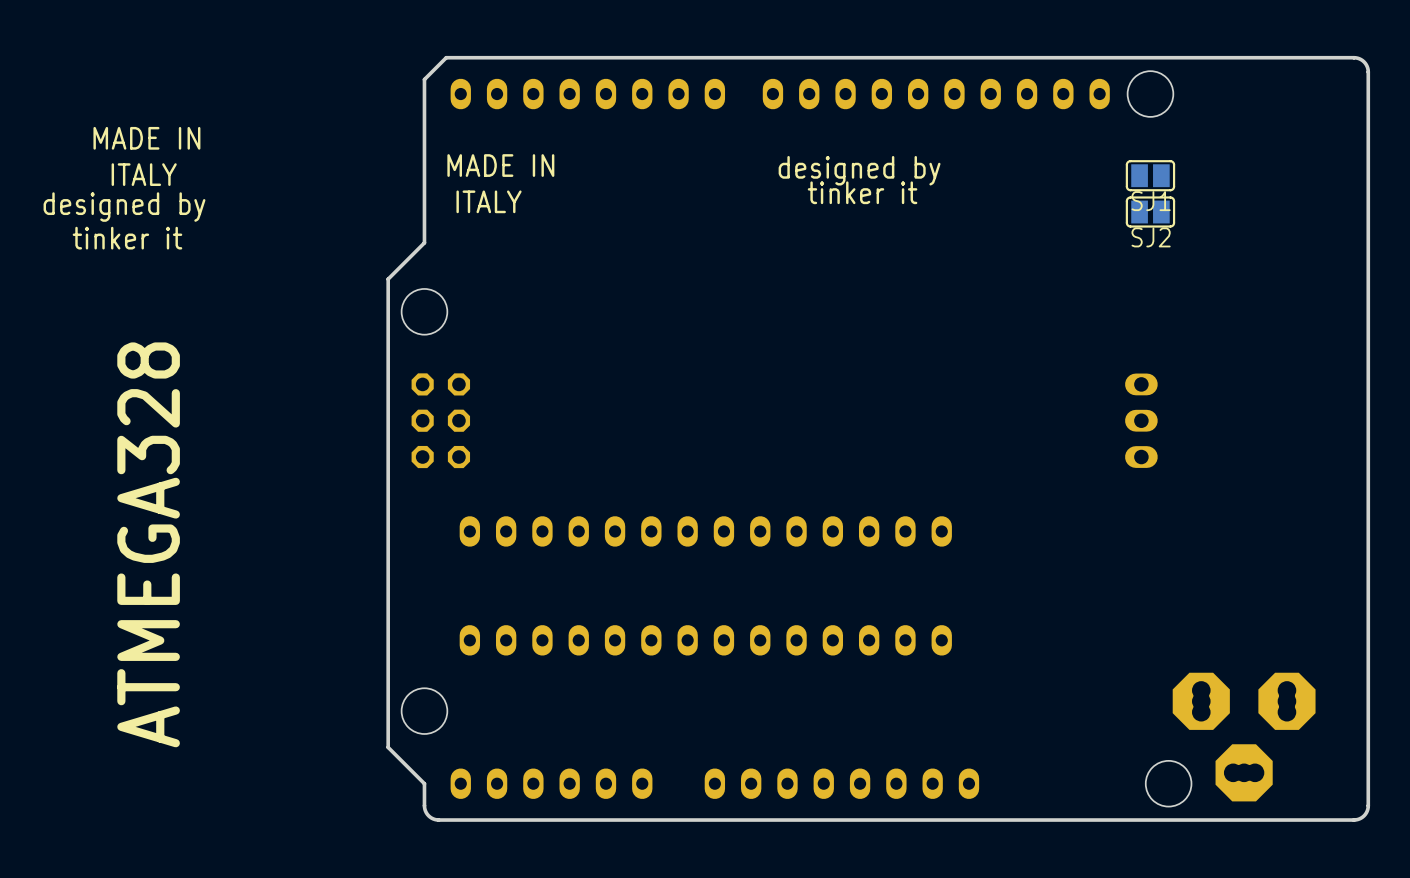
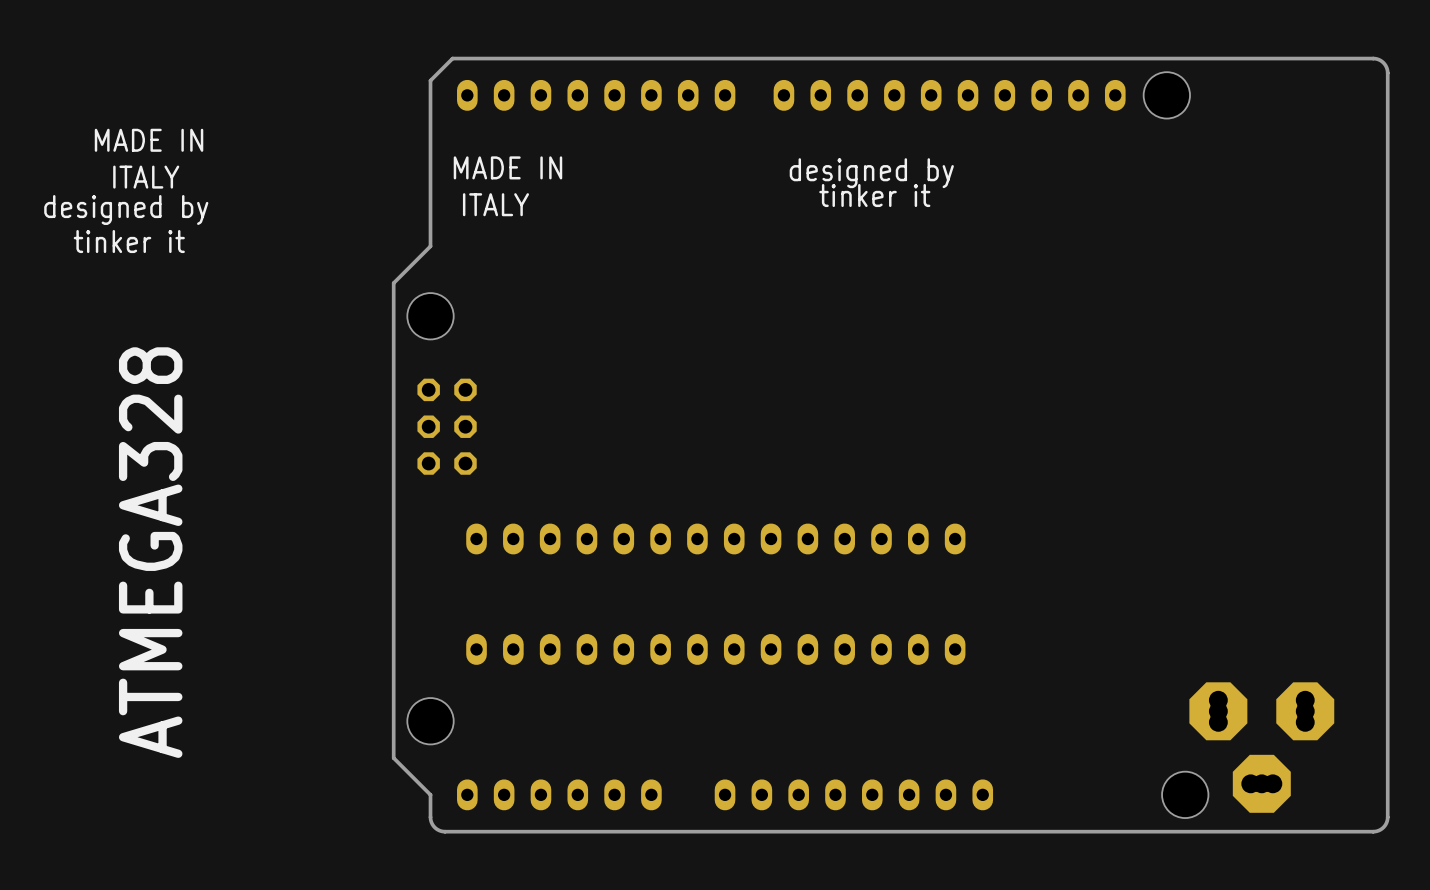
SJ1: (1150, 175) -> none
SJ2: (1150, 212) -> none
part: (1141, 420) -> none

